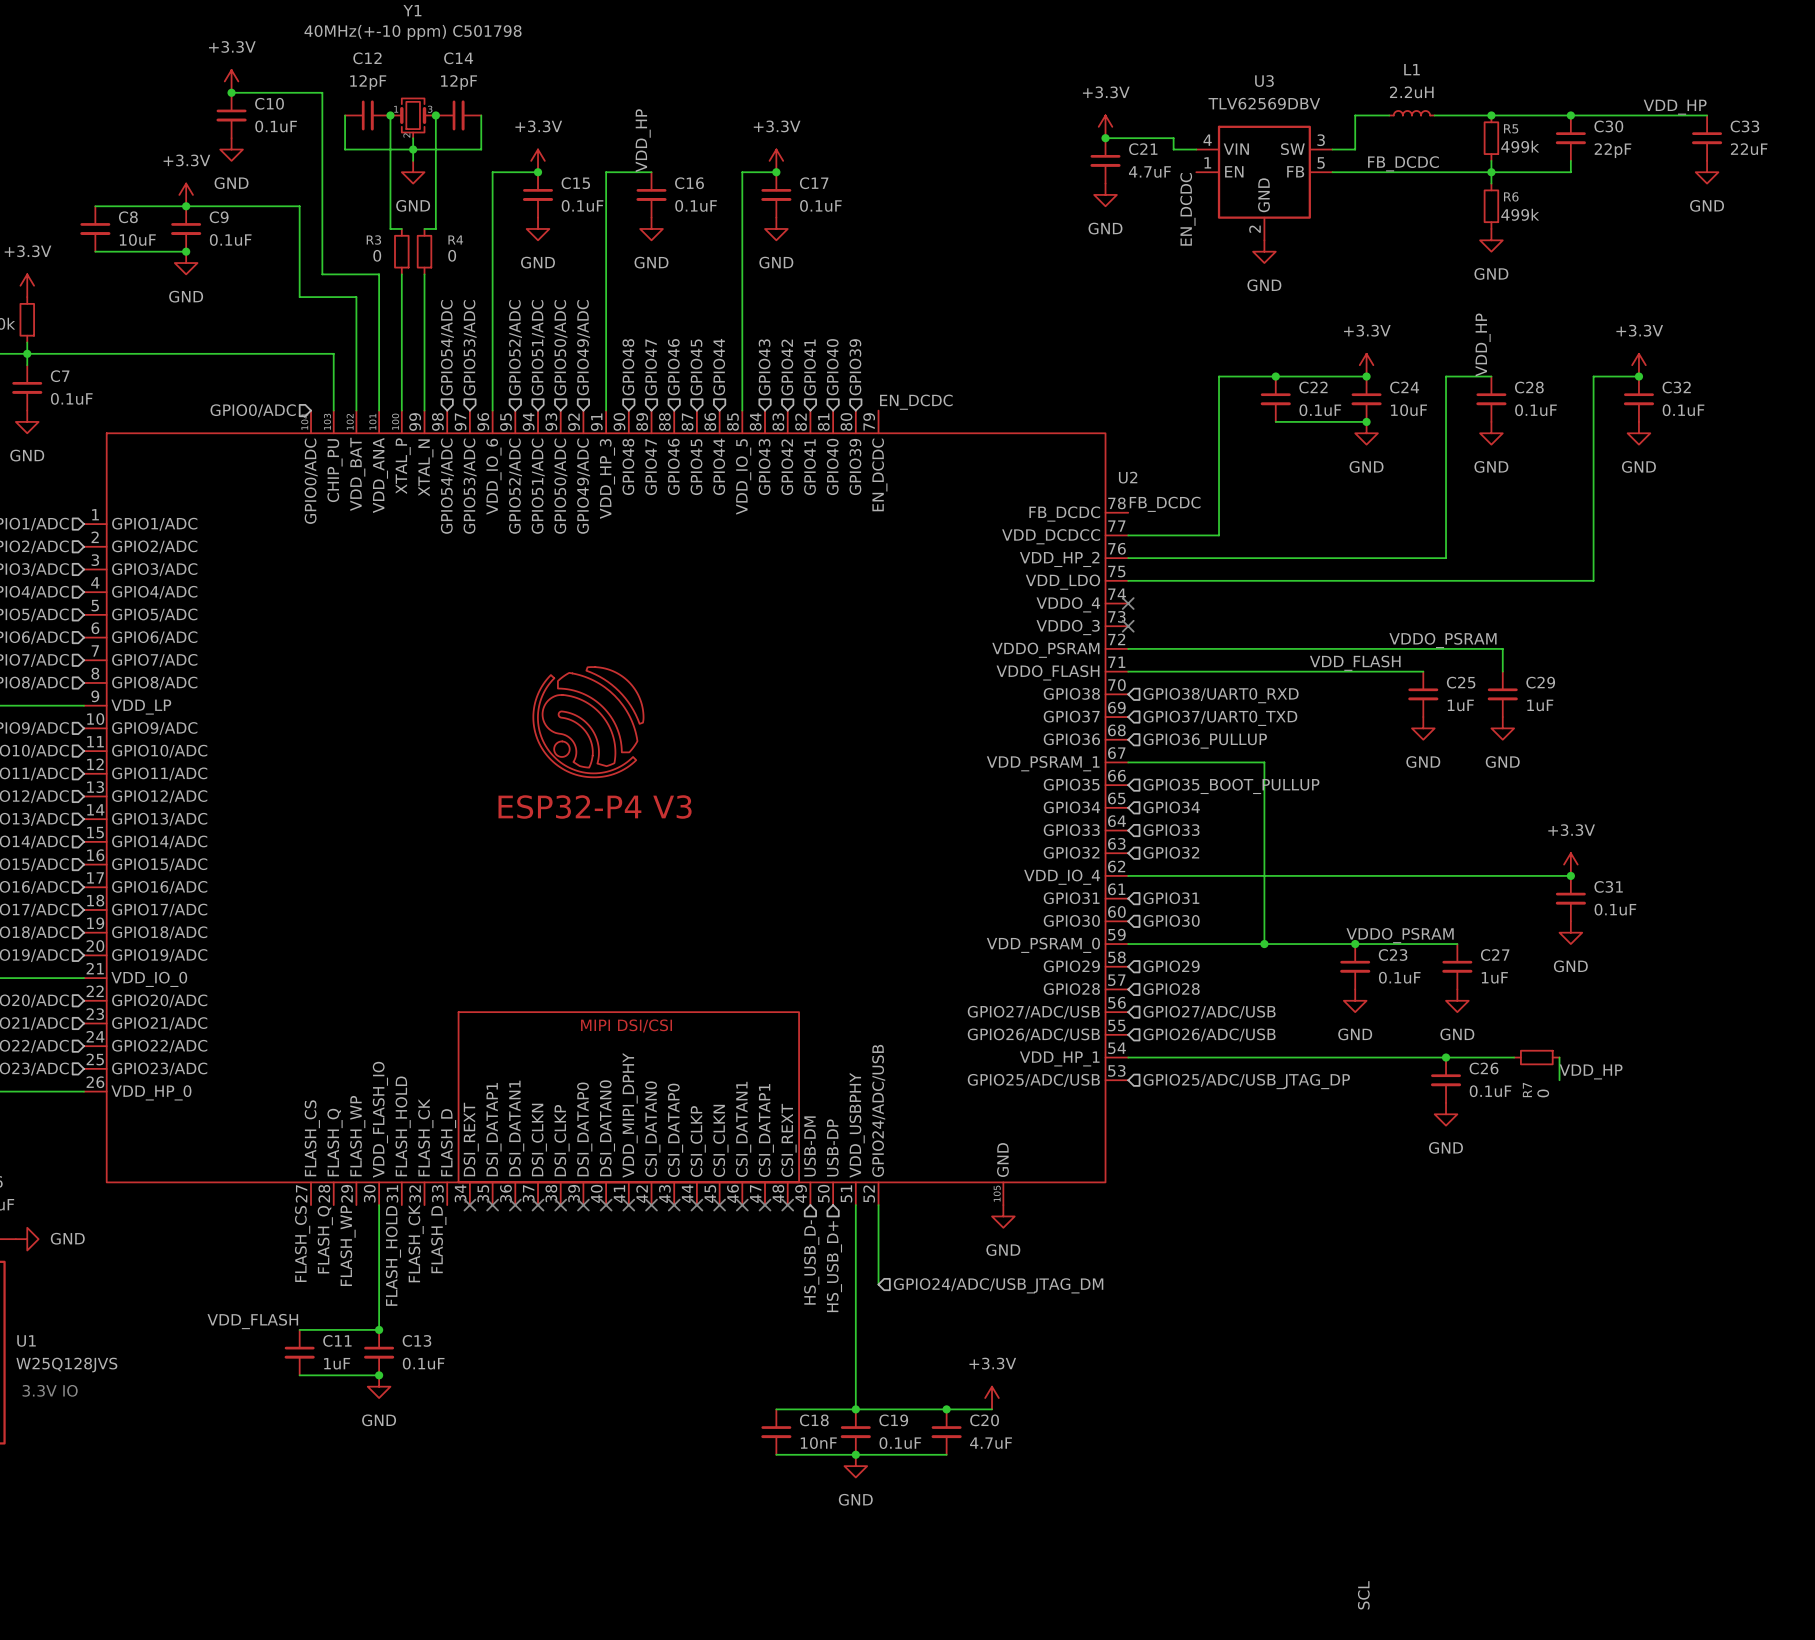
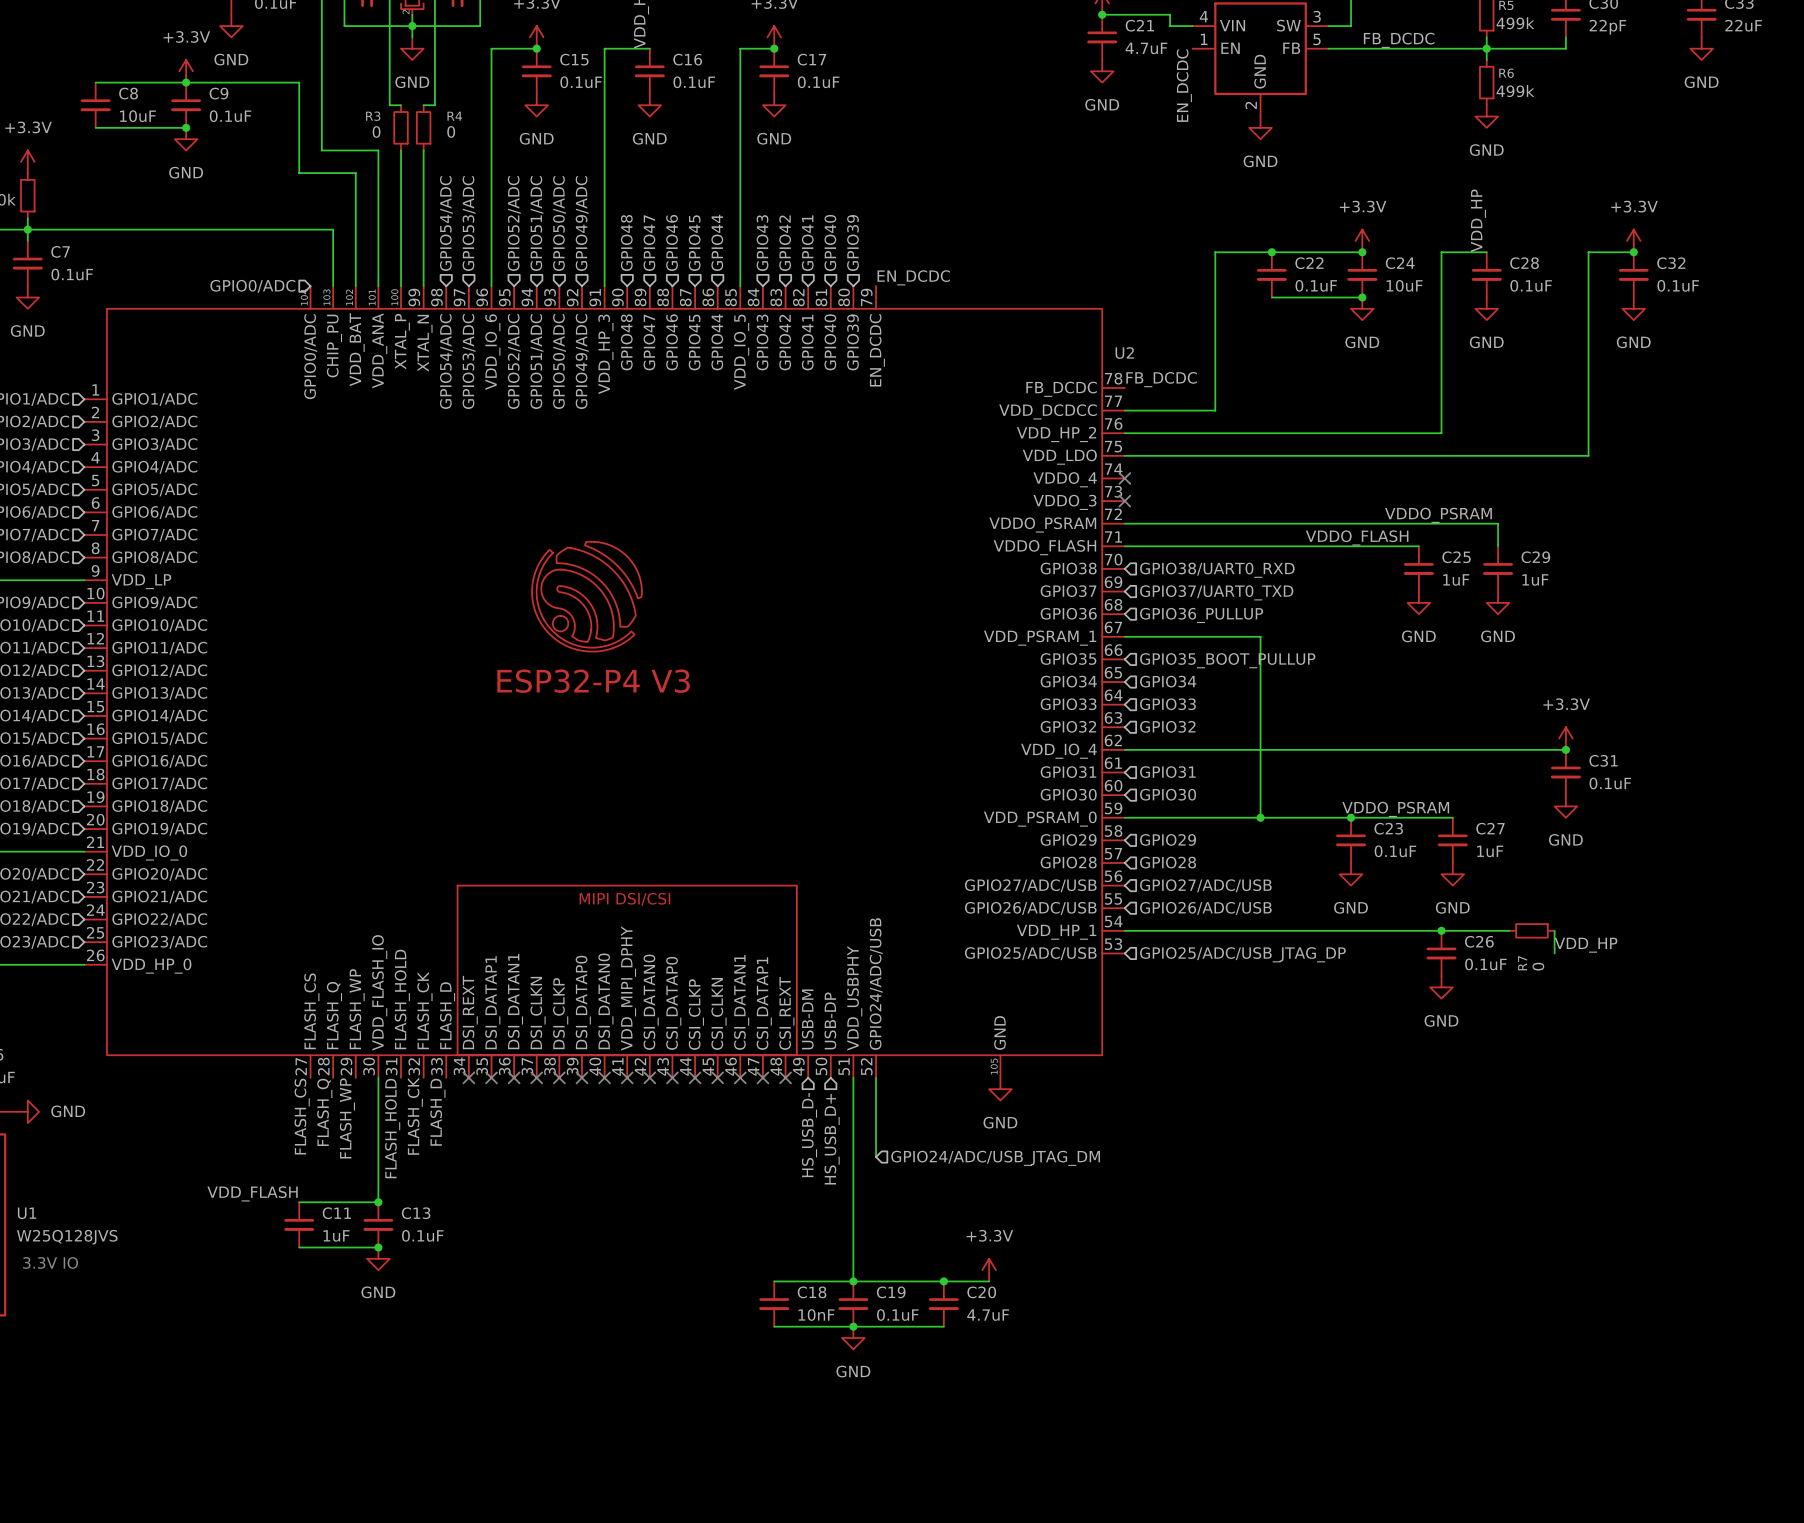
label: VDD_FLASH (1355, 663) -> VDDO_FLASH (1357, 537)
label: SCL (1363, 1595) -> none

